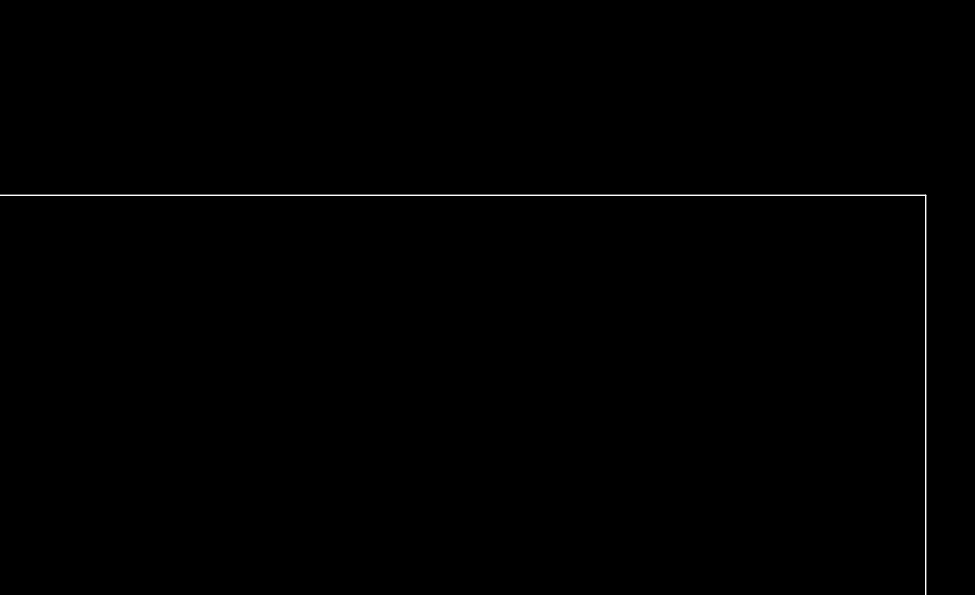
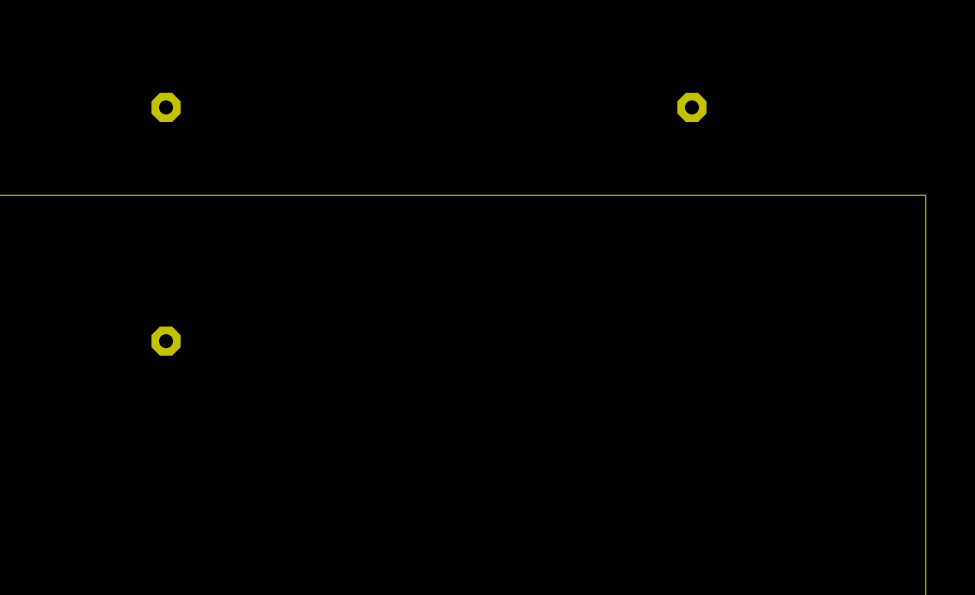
part: none -> (166, 107)
part: none -> (691, 107)
part: none -> (166, 341)

